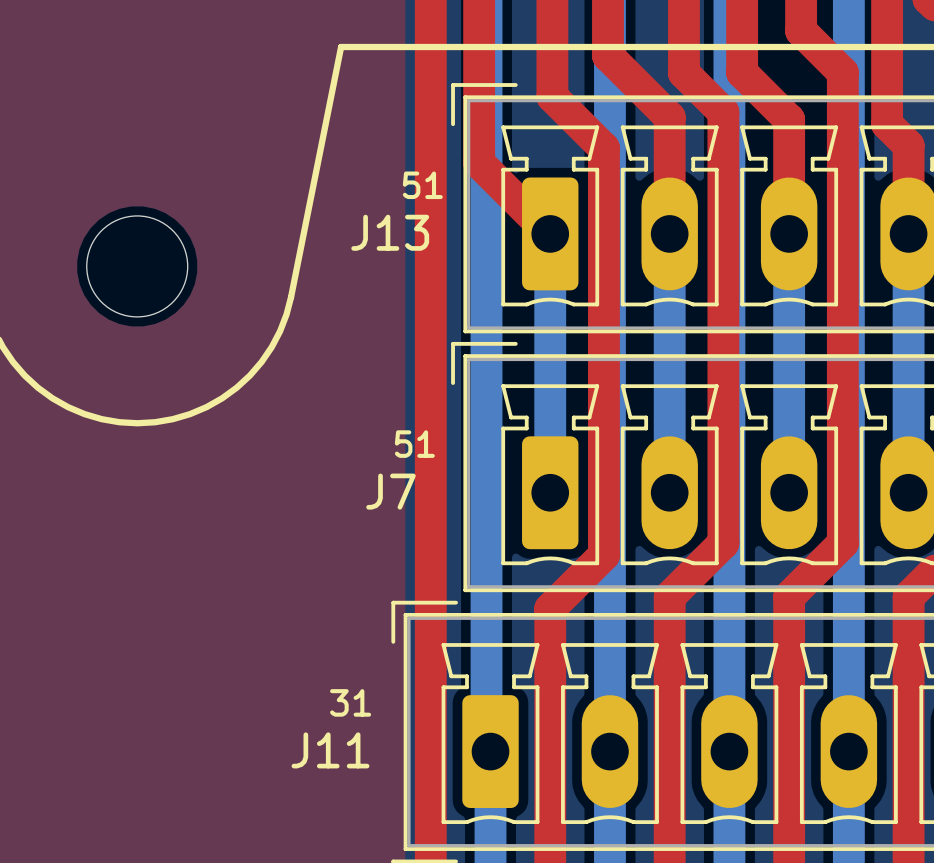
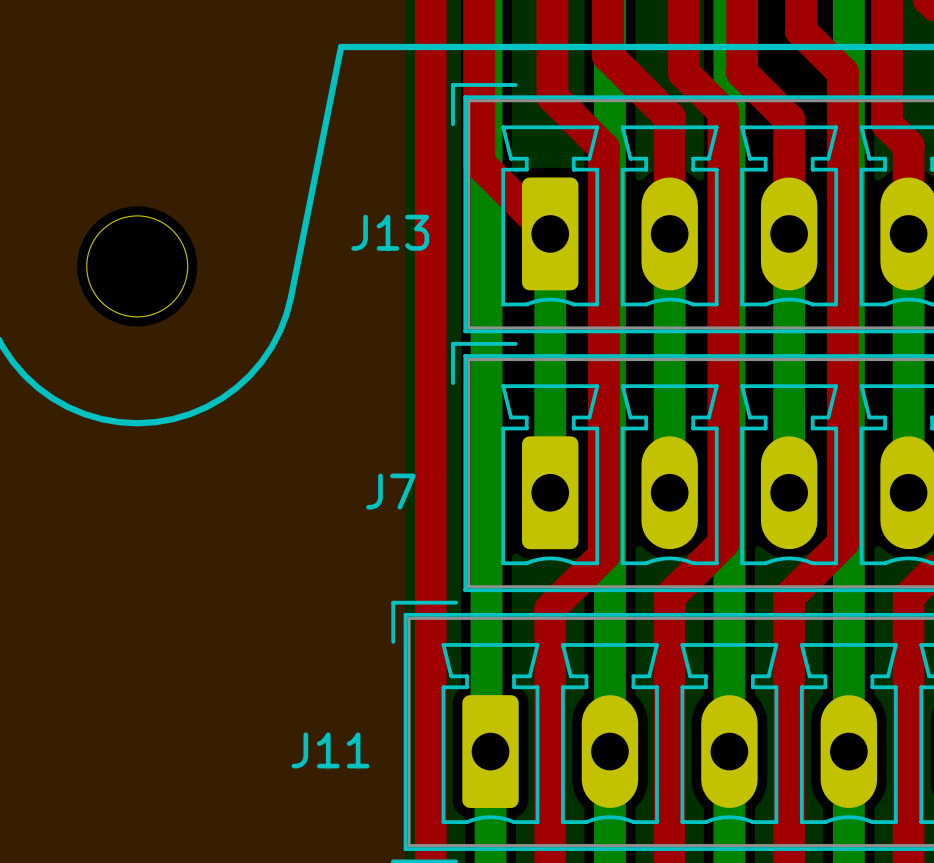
text: 51 (422, 185) -> none
text: 51 (414, 444) -> none
text: 31 (350, 702) -> none

